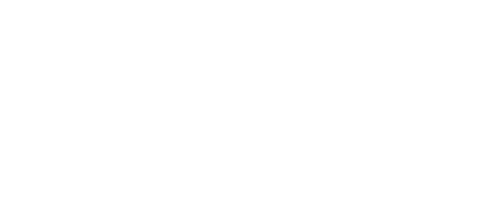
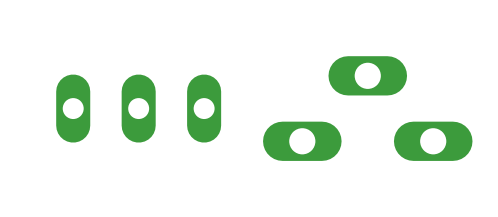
part: none -> (138, 108)
part: none -> (367, 108)

